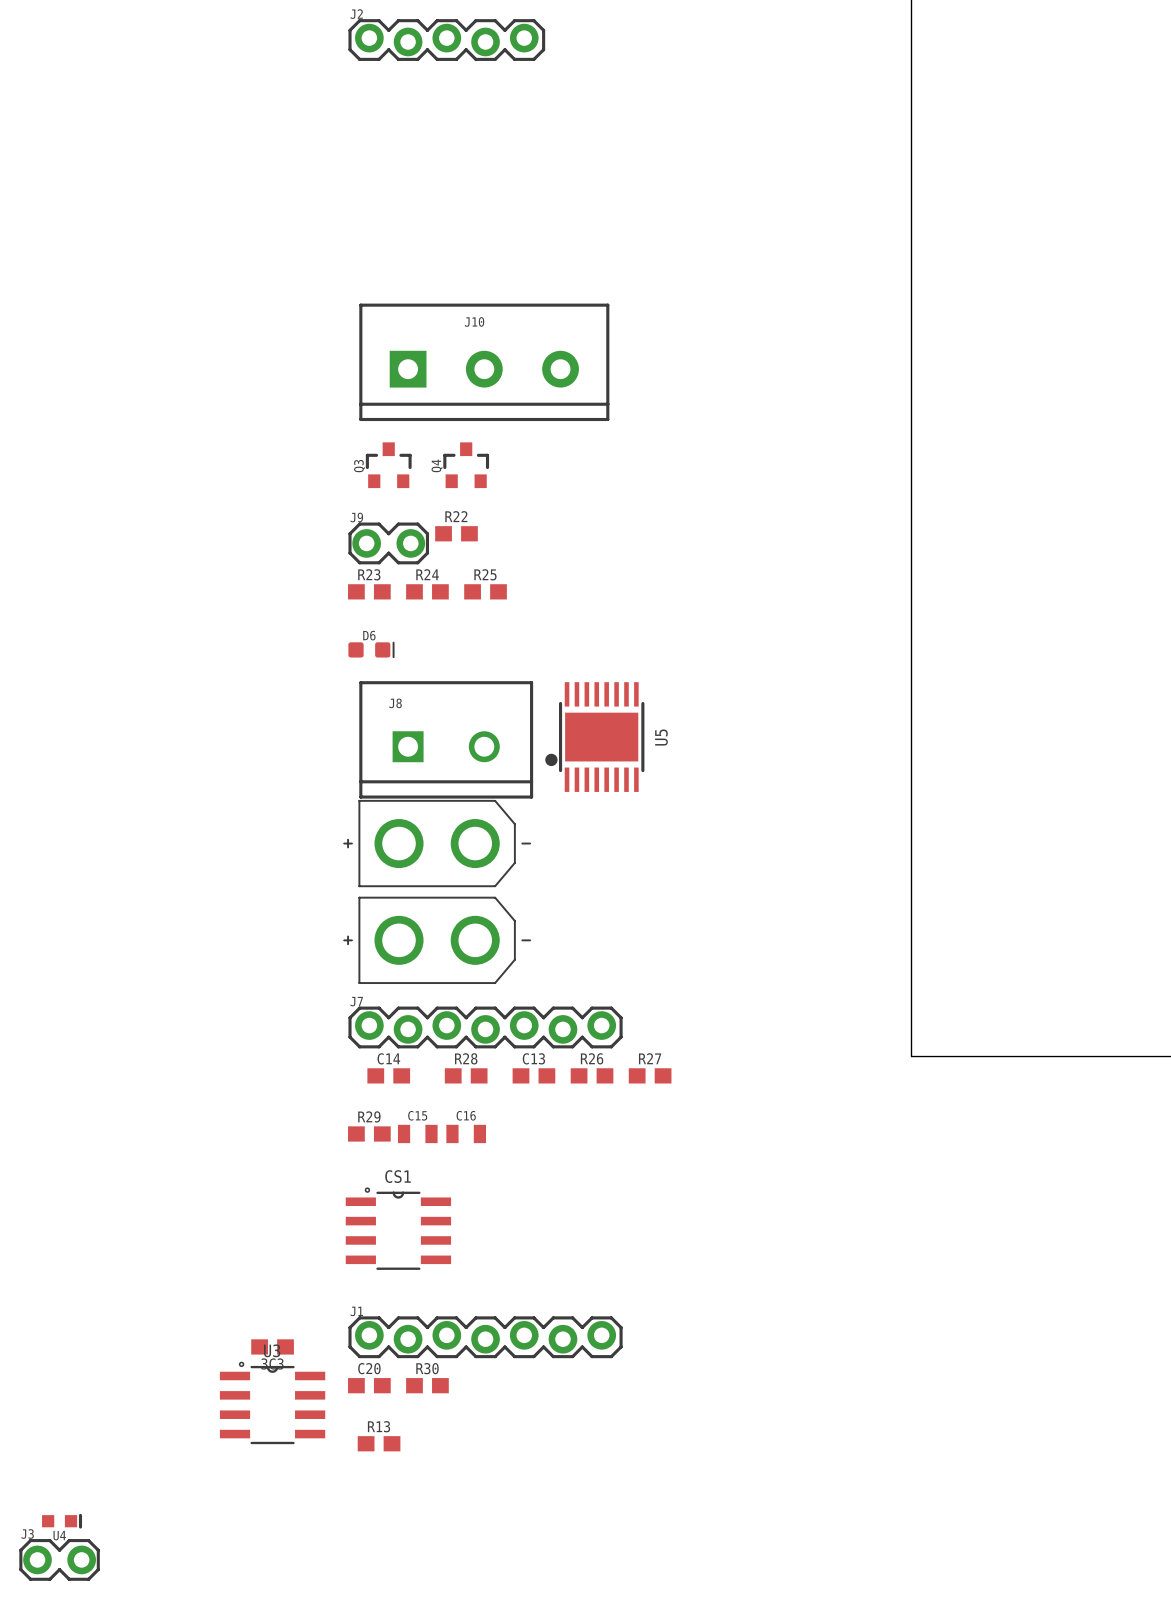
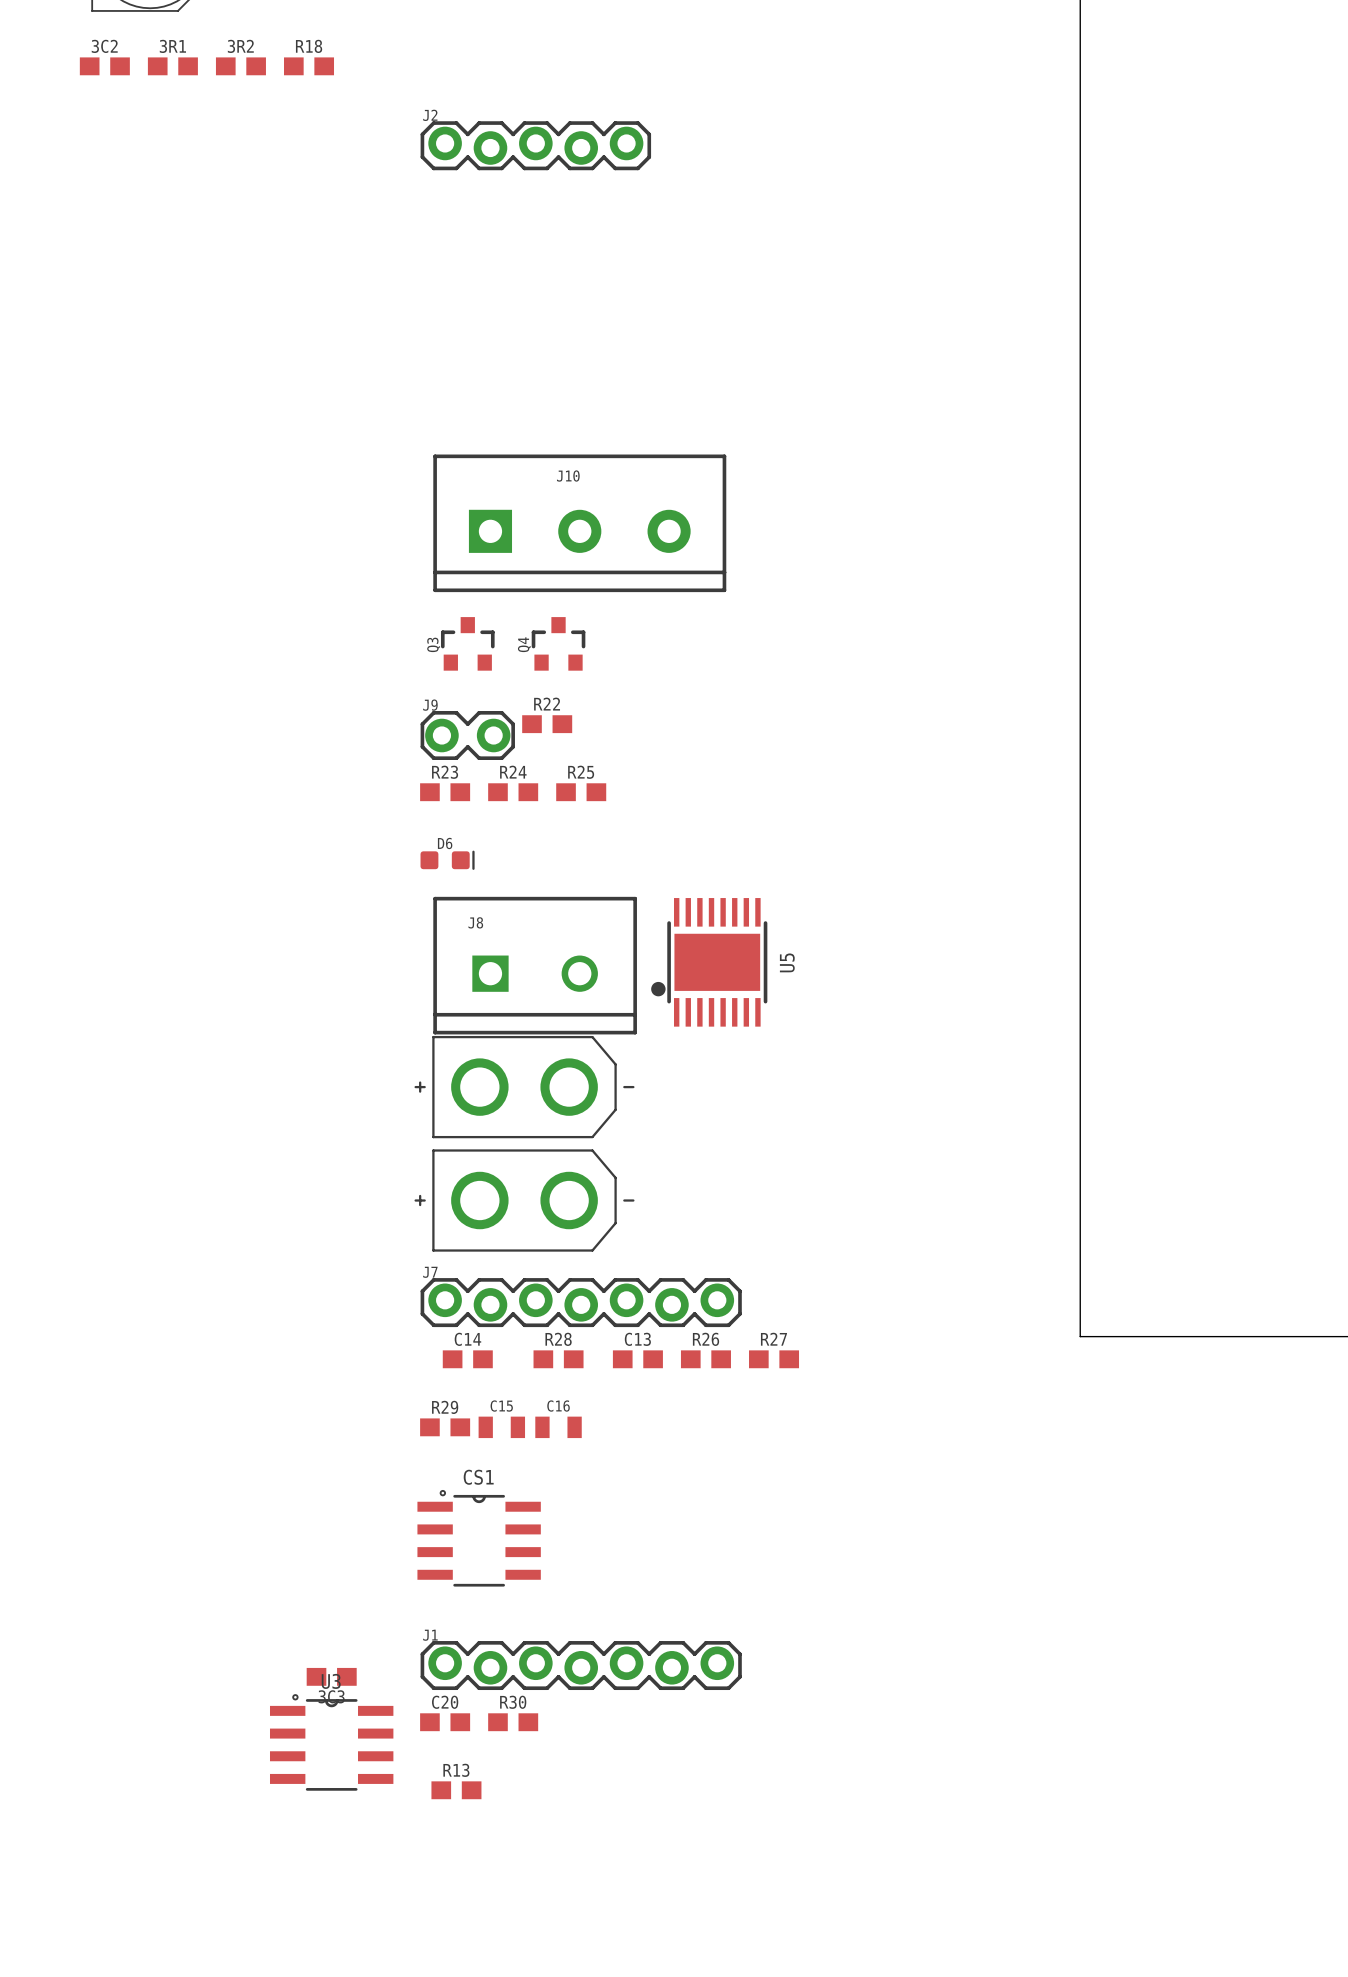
U4: (62, 1521) -> none
J3: (59, 1559) -> none

